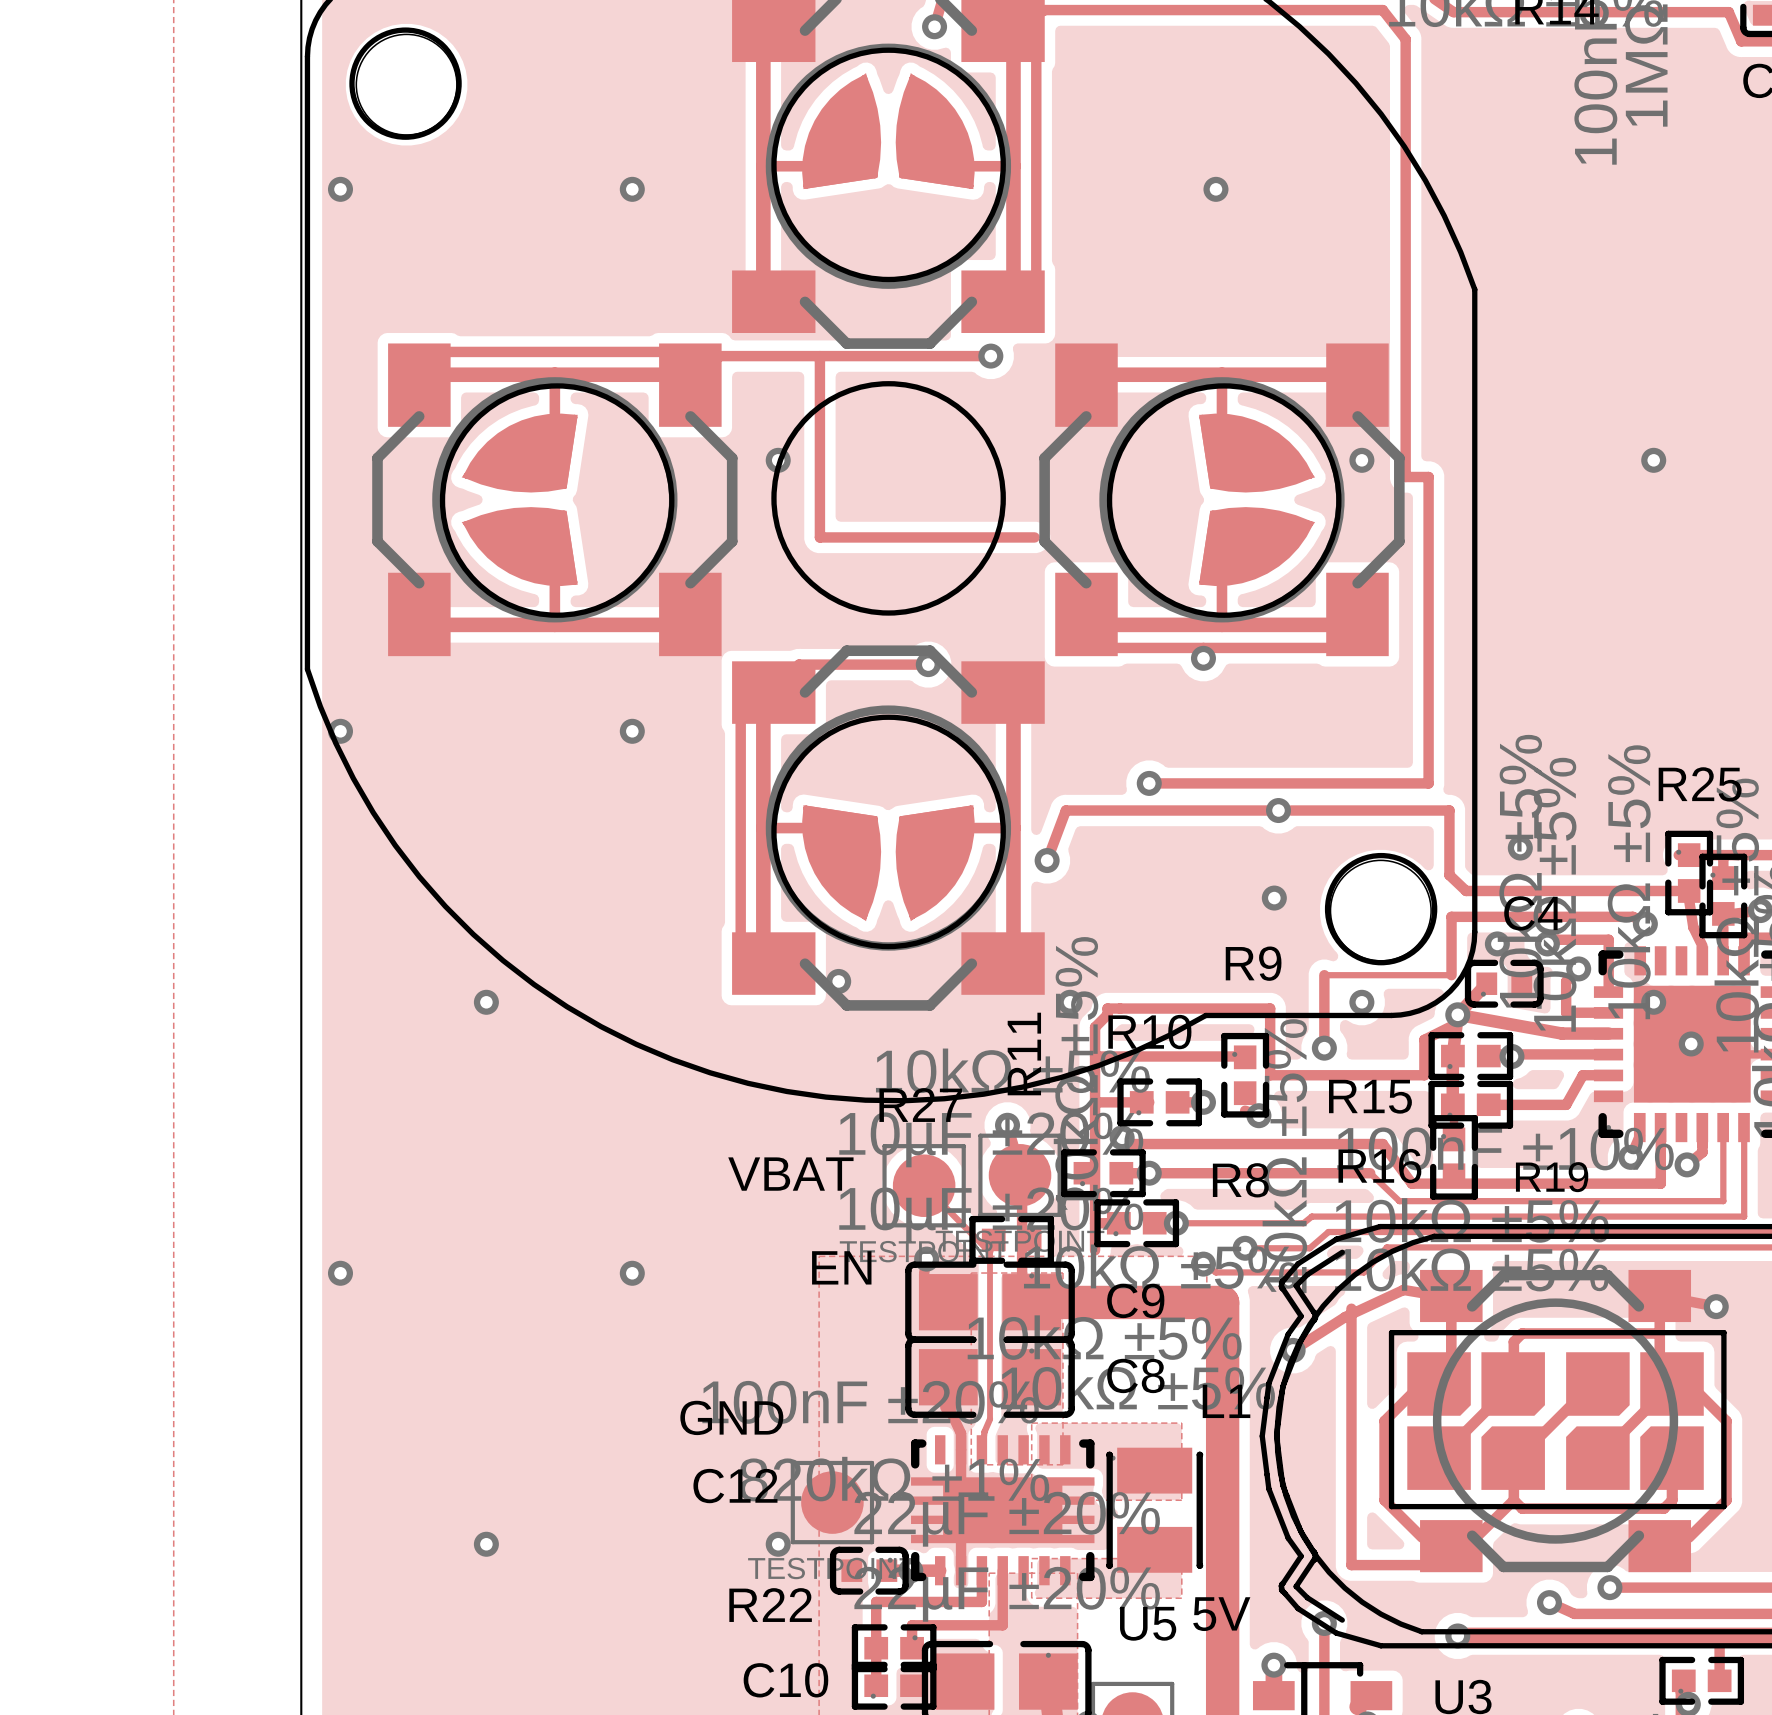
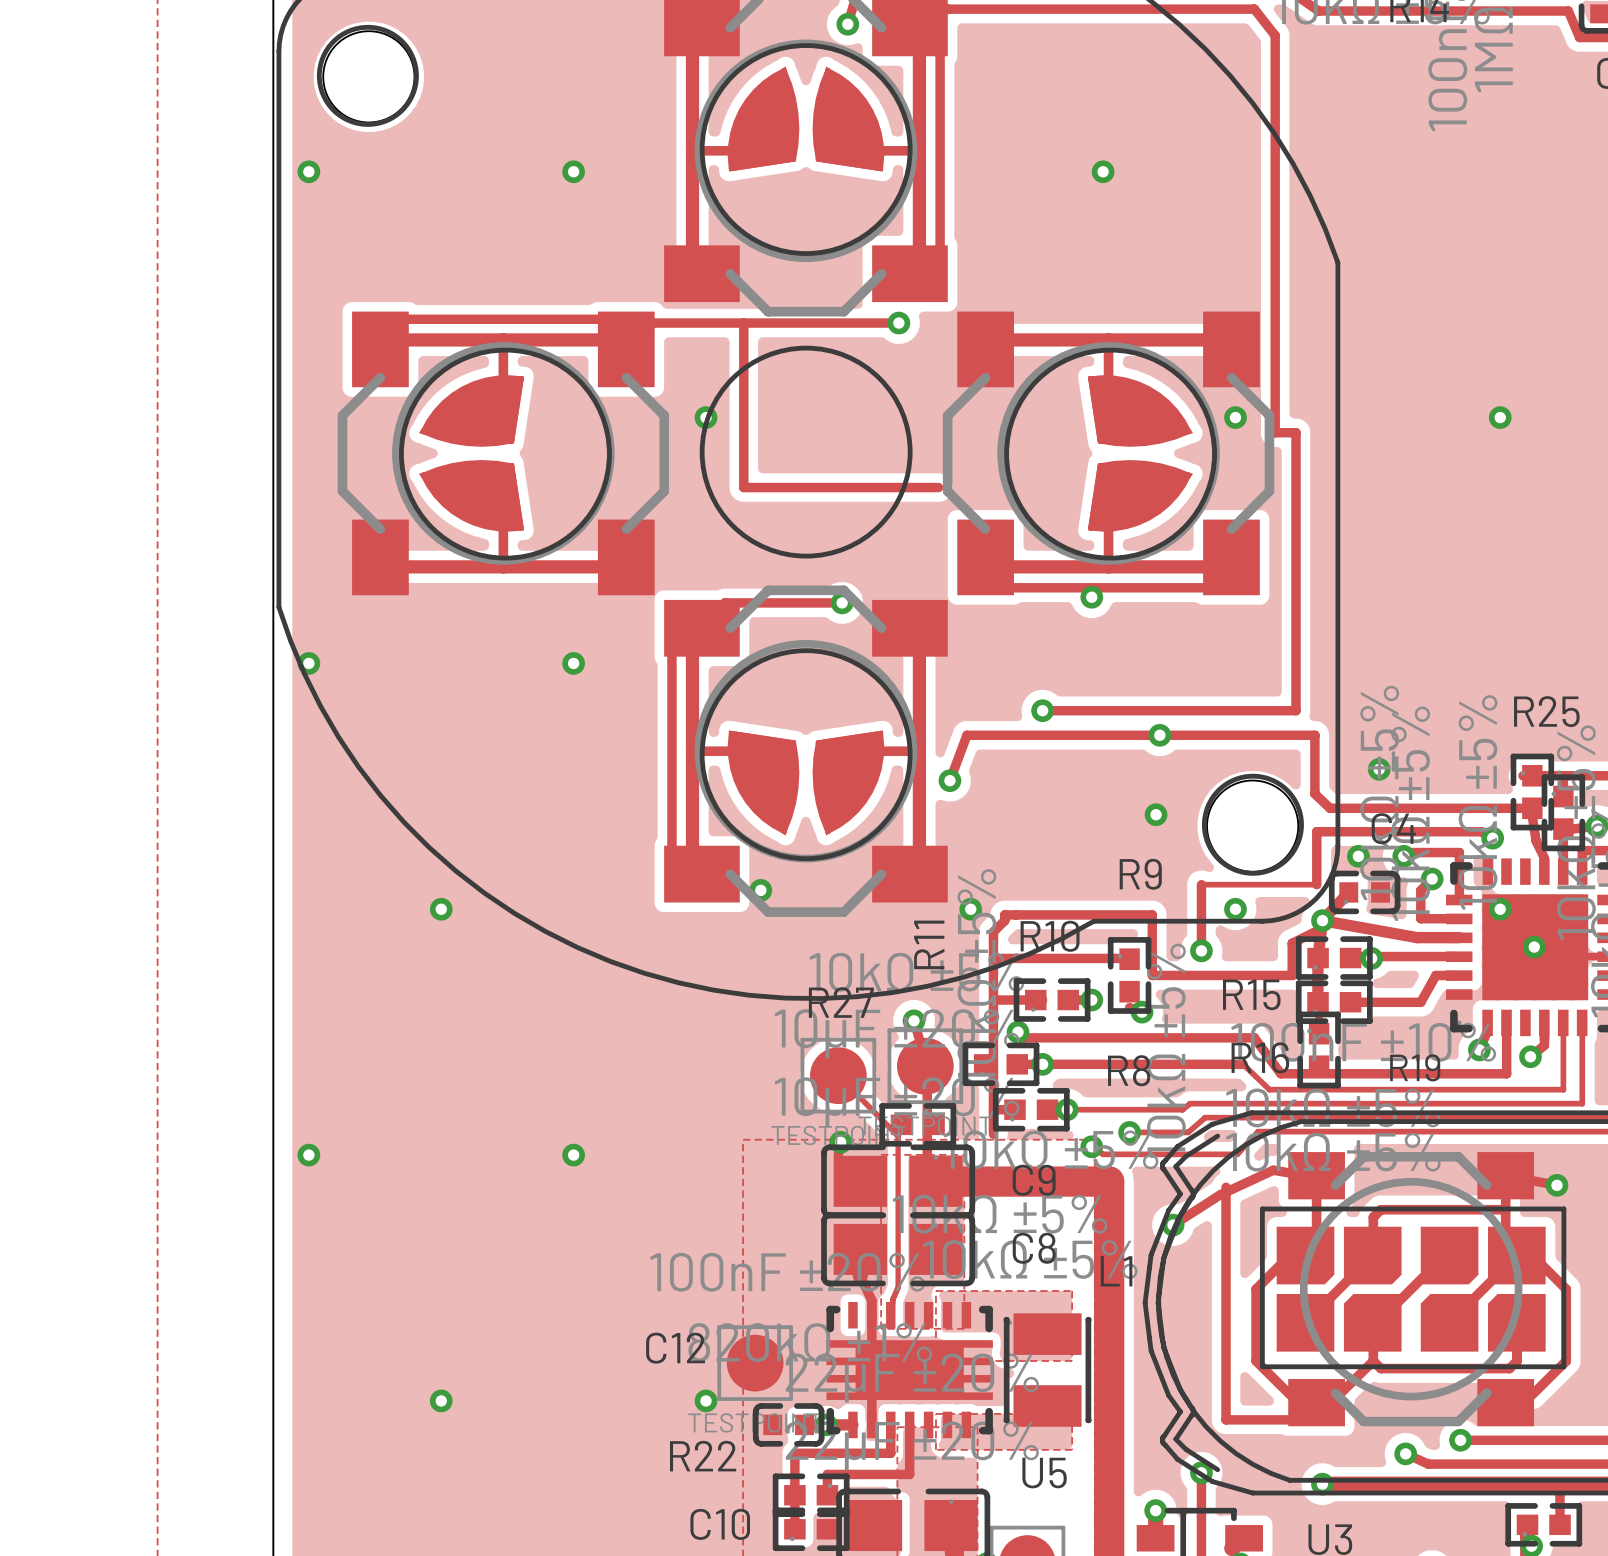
text: VBAT (790, 1174) -> none
text: EN (841, 1267) -> none
text: GND (731, 1417) -> none
text: 5V (1221, 1614) -> none

